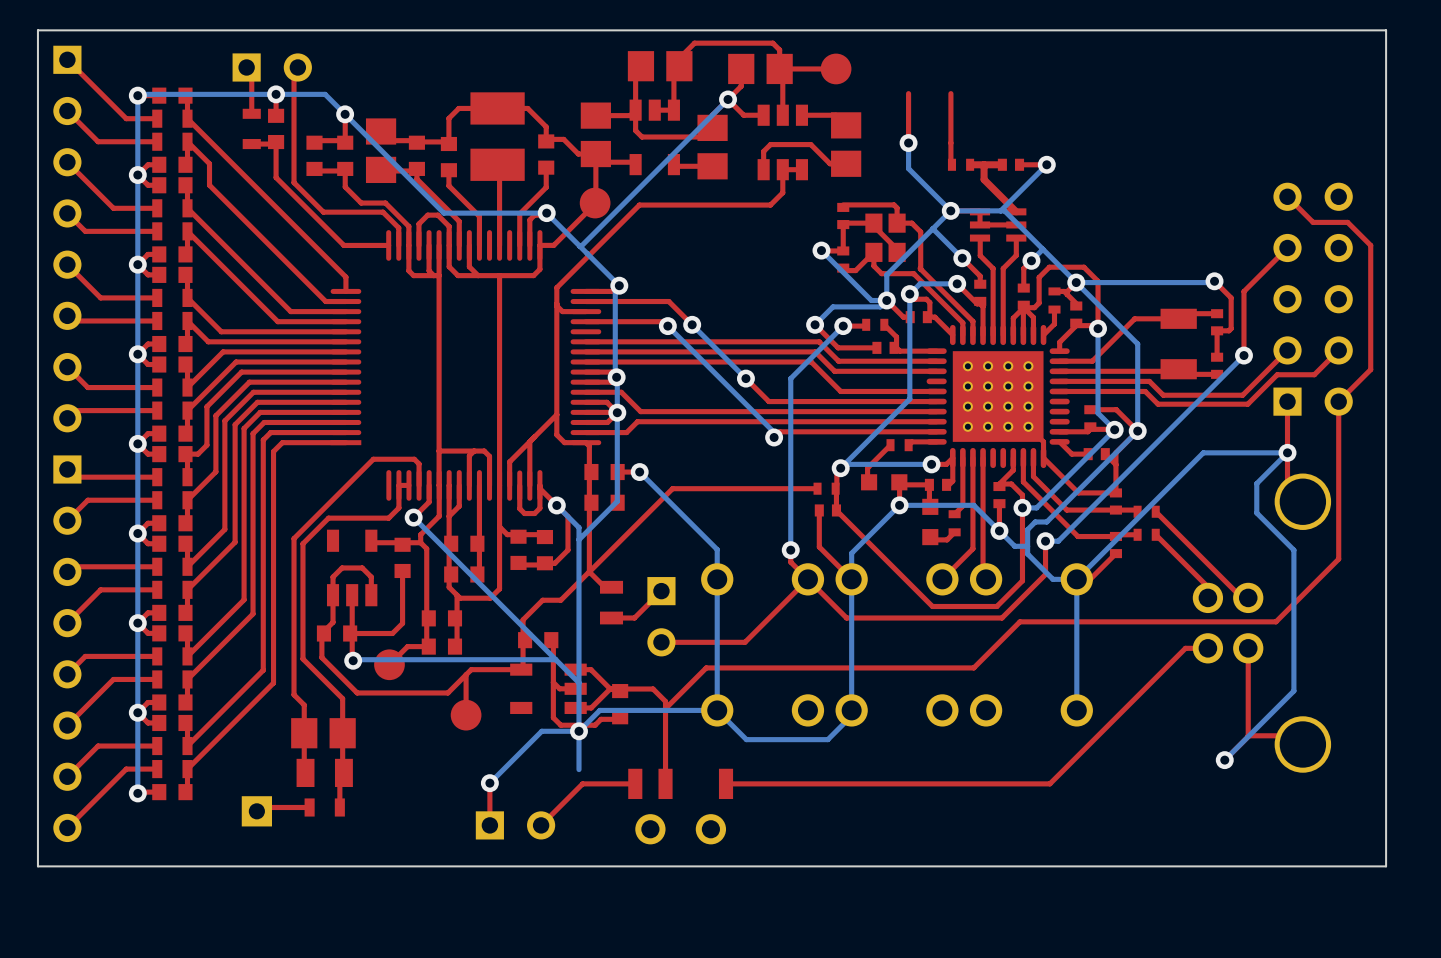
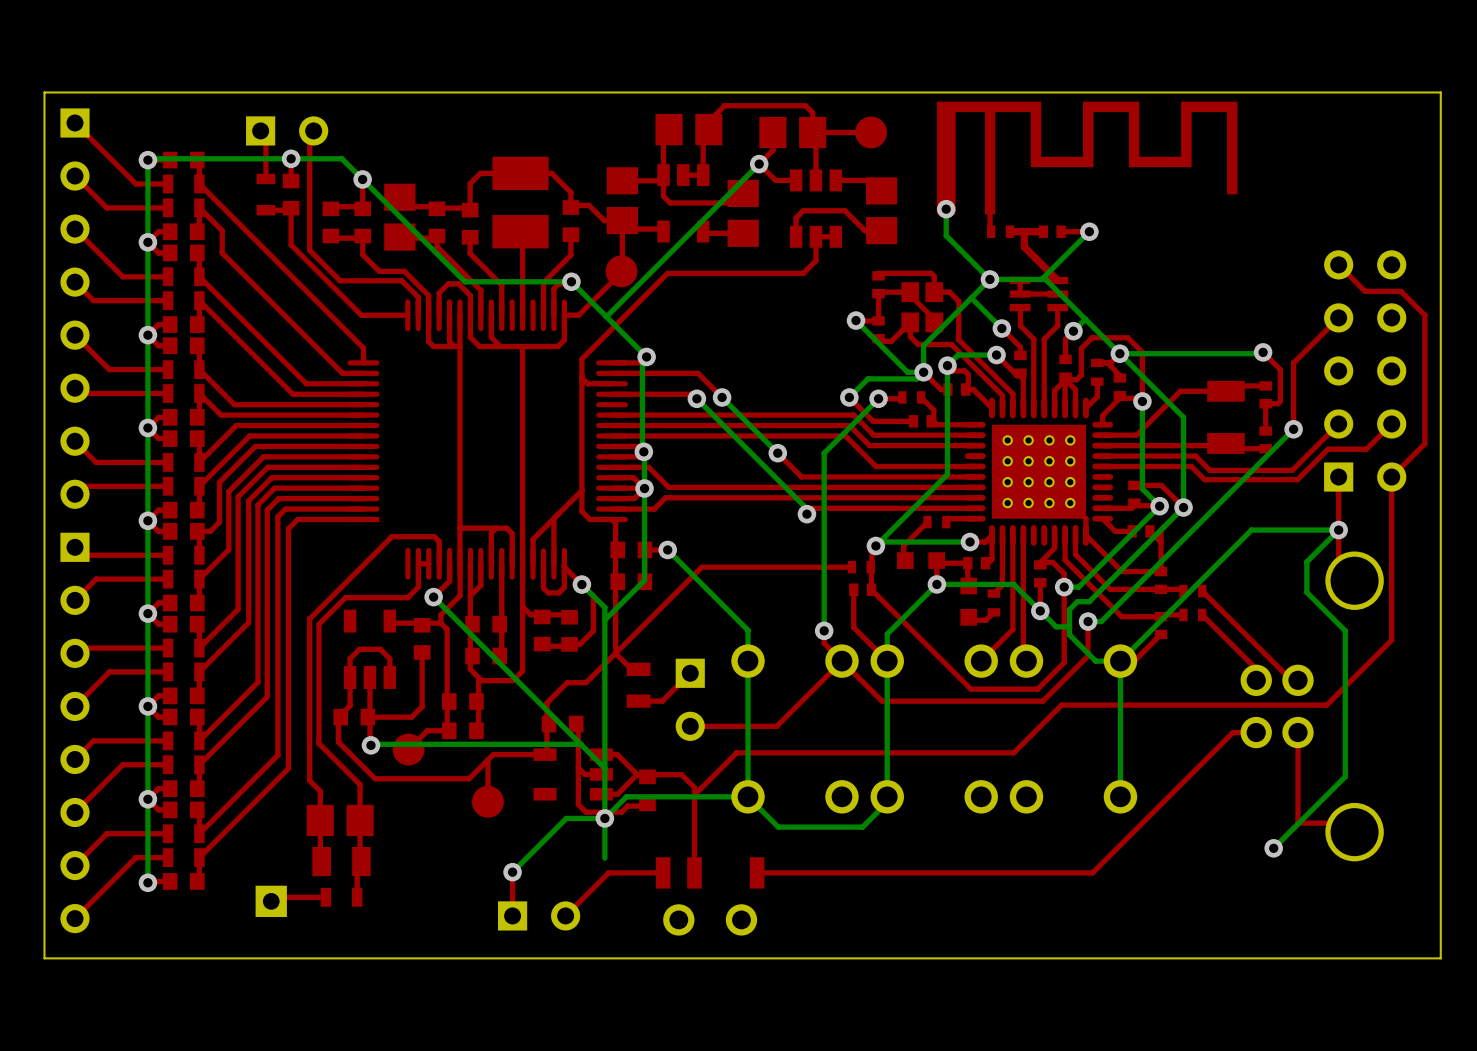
part: none -> (1087, 158)

